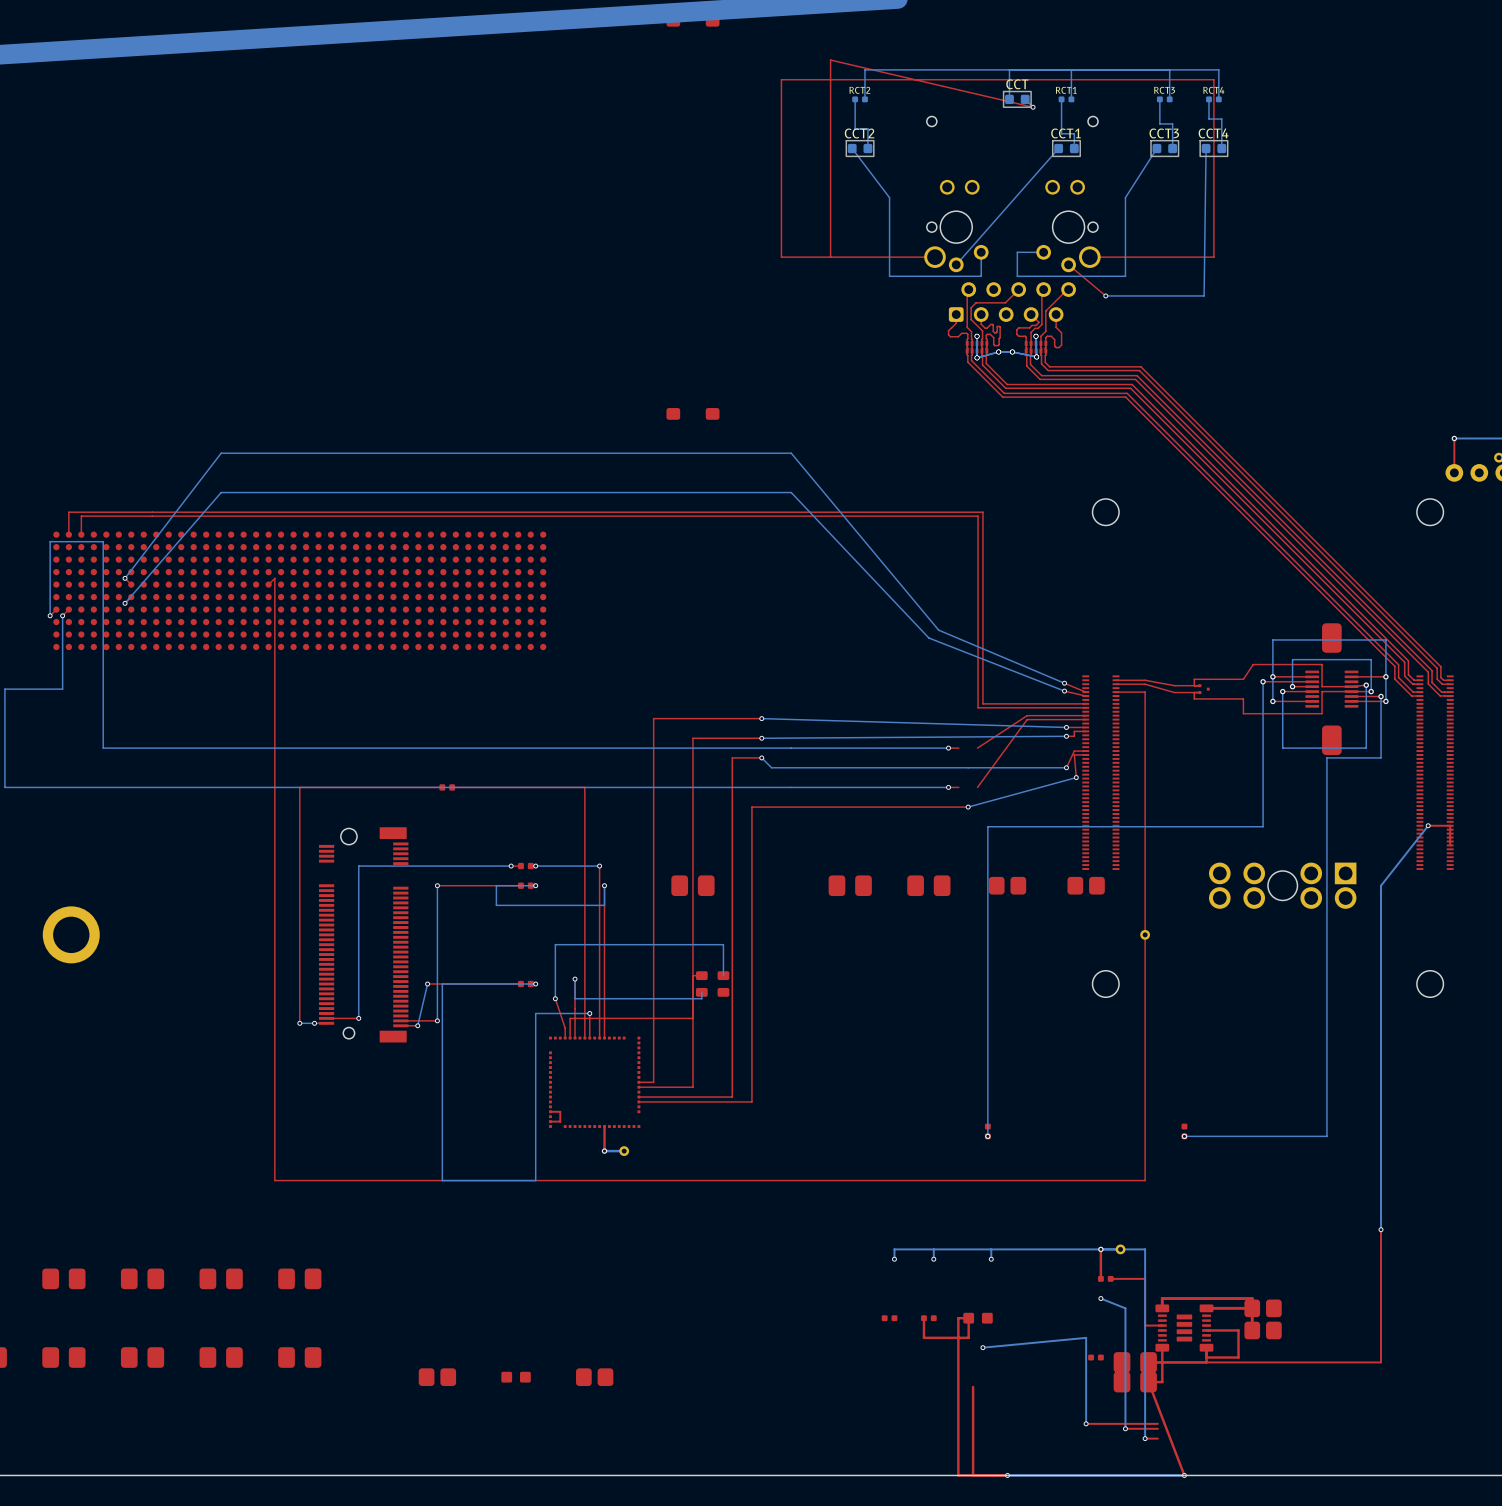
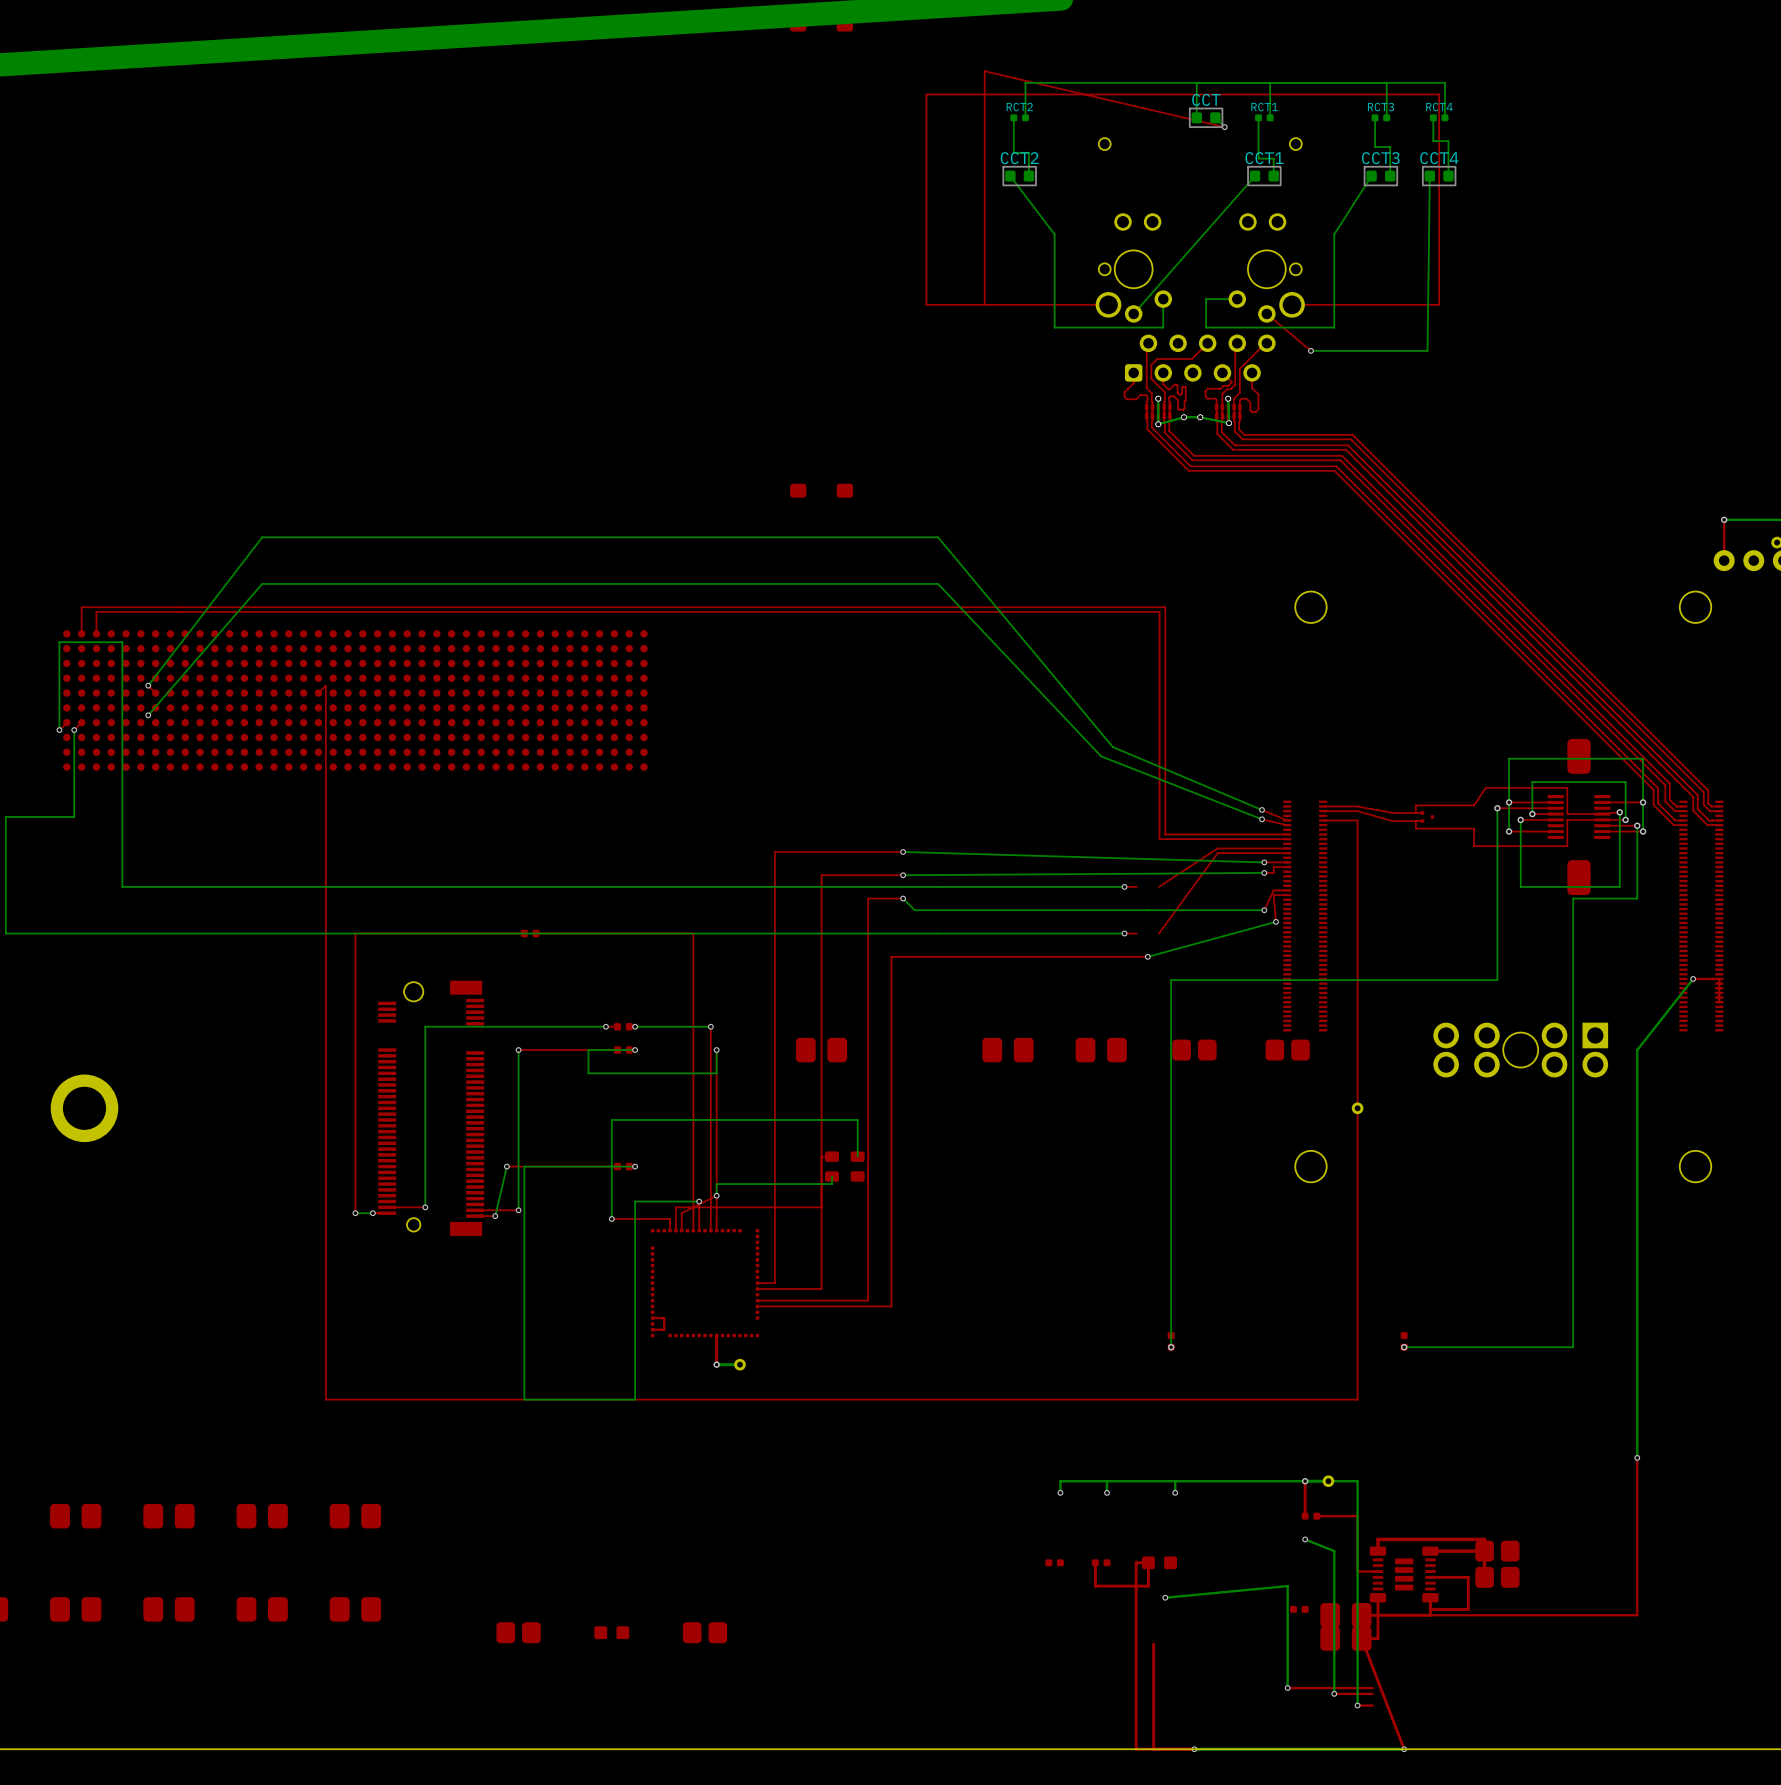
bottom track: (555, 944) (555, 998) -> (658, 1119) (611, 1119) (611, 1219)
top track: (575, 979) (575, 1023) -> (716, 1195) (681, 1213)
bottom track: (575, 979) (575, 998) (604, 998) -> (716, 1195) (716, 1184)
via: (575, 979) -> none
top track: (555, 998) (565, 1028) -> (611, 1219) (670, 1219)
via: (555, 998) -> none
via: none -> (716, 1195)
via: none -> (611, 1219)

